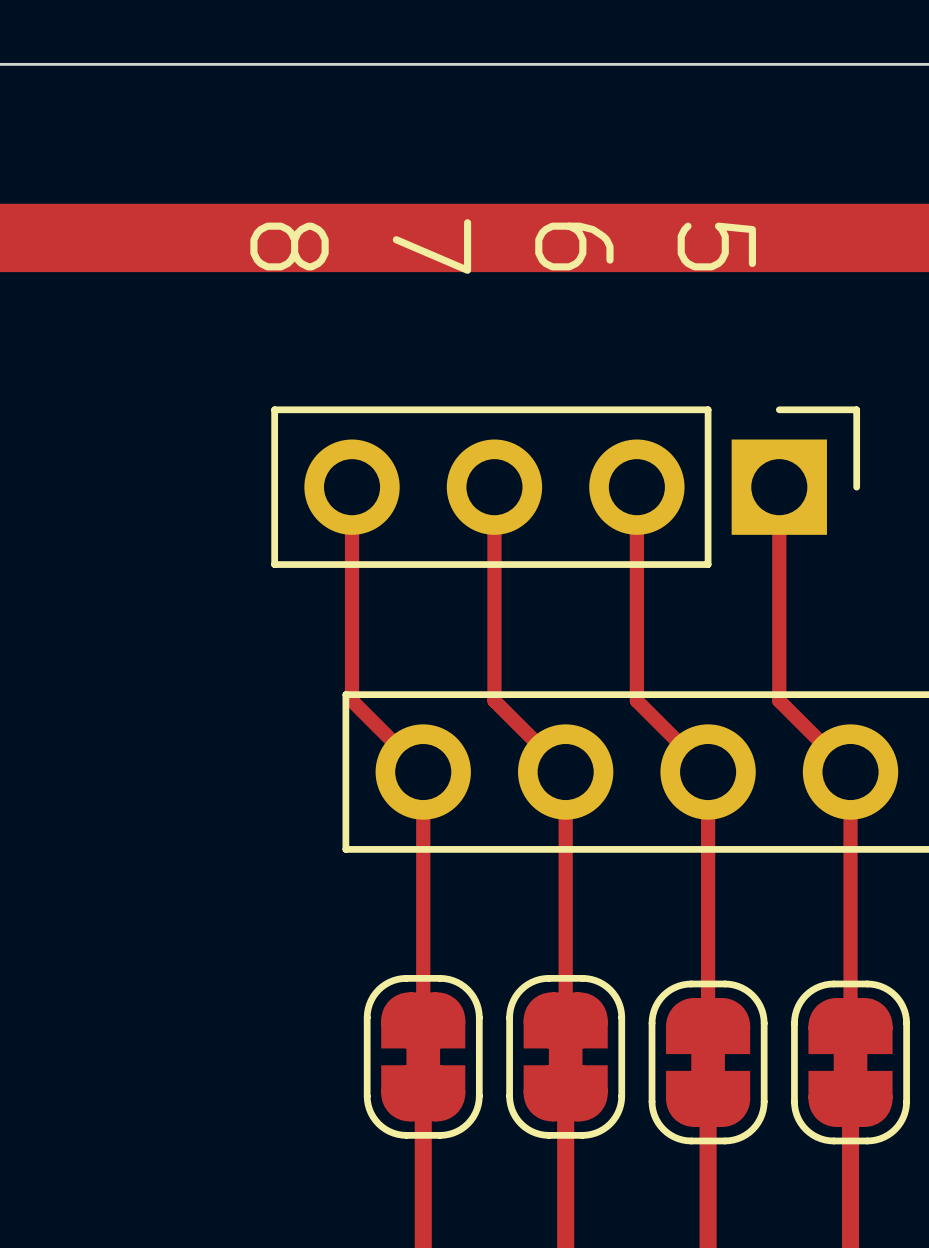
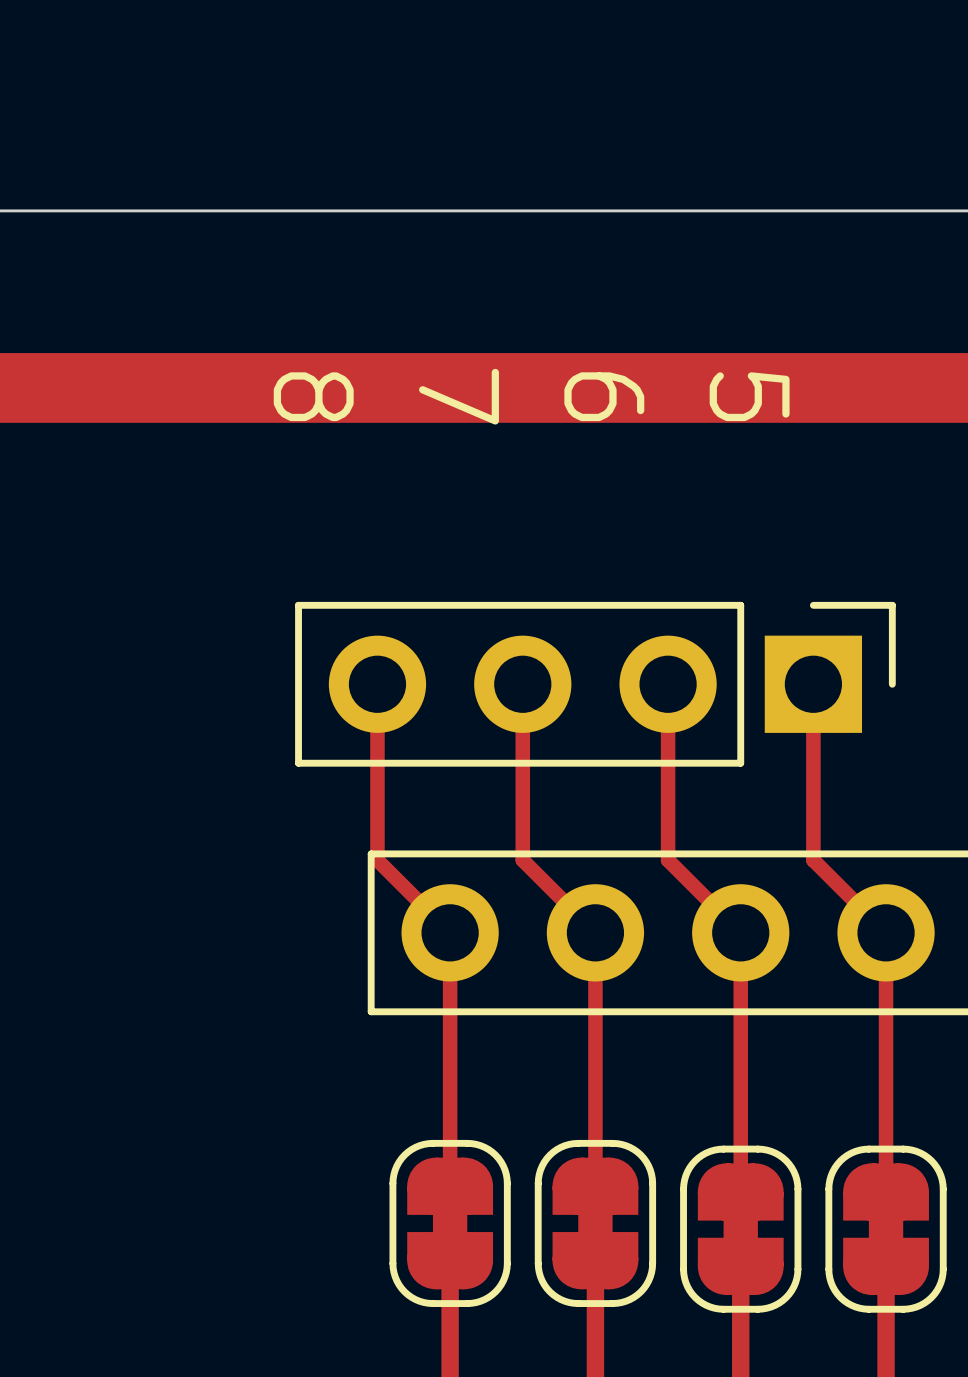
part position: (565, 487) -> (595, 684)

